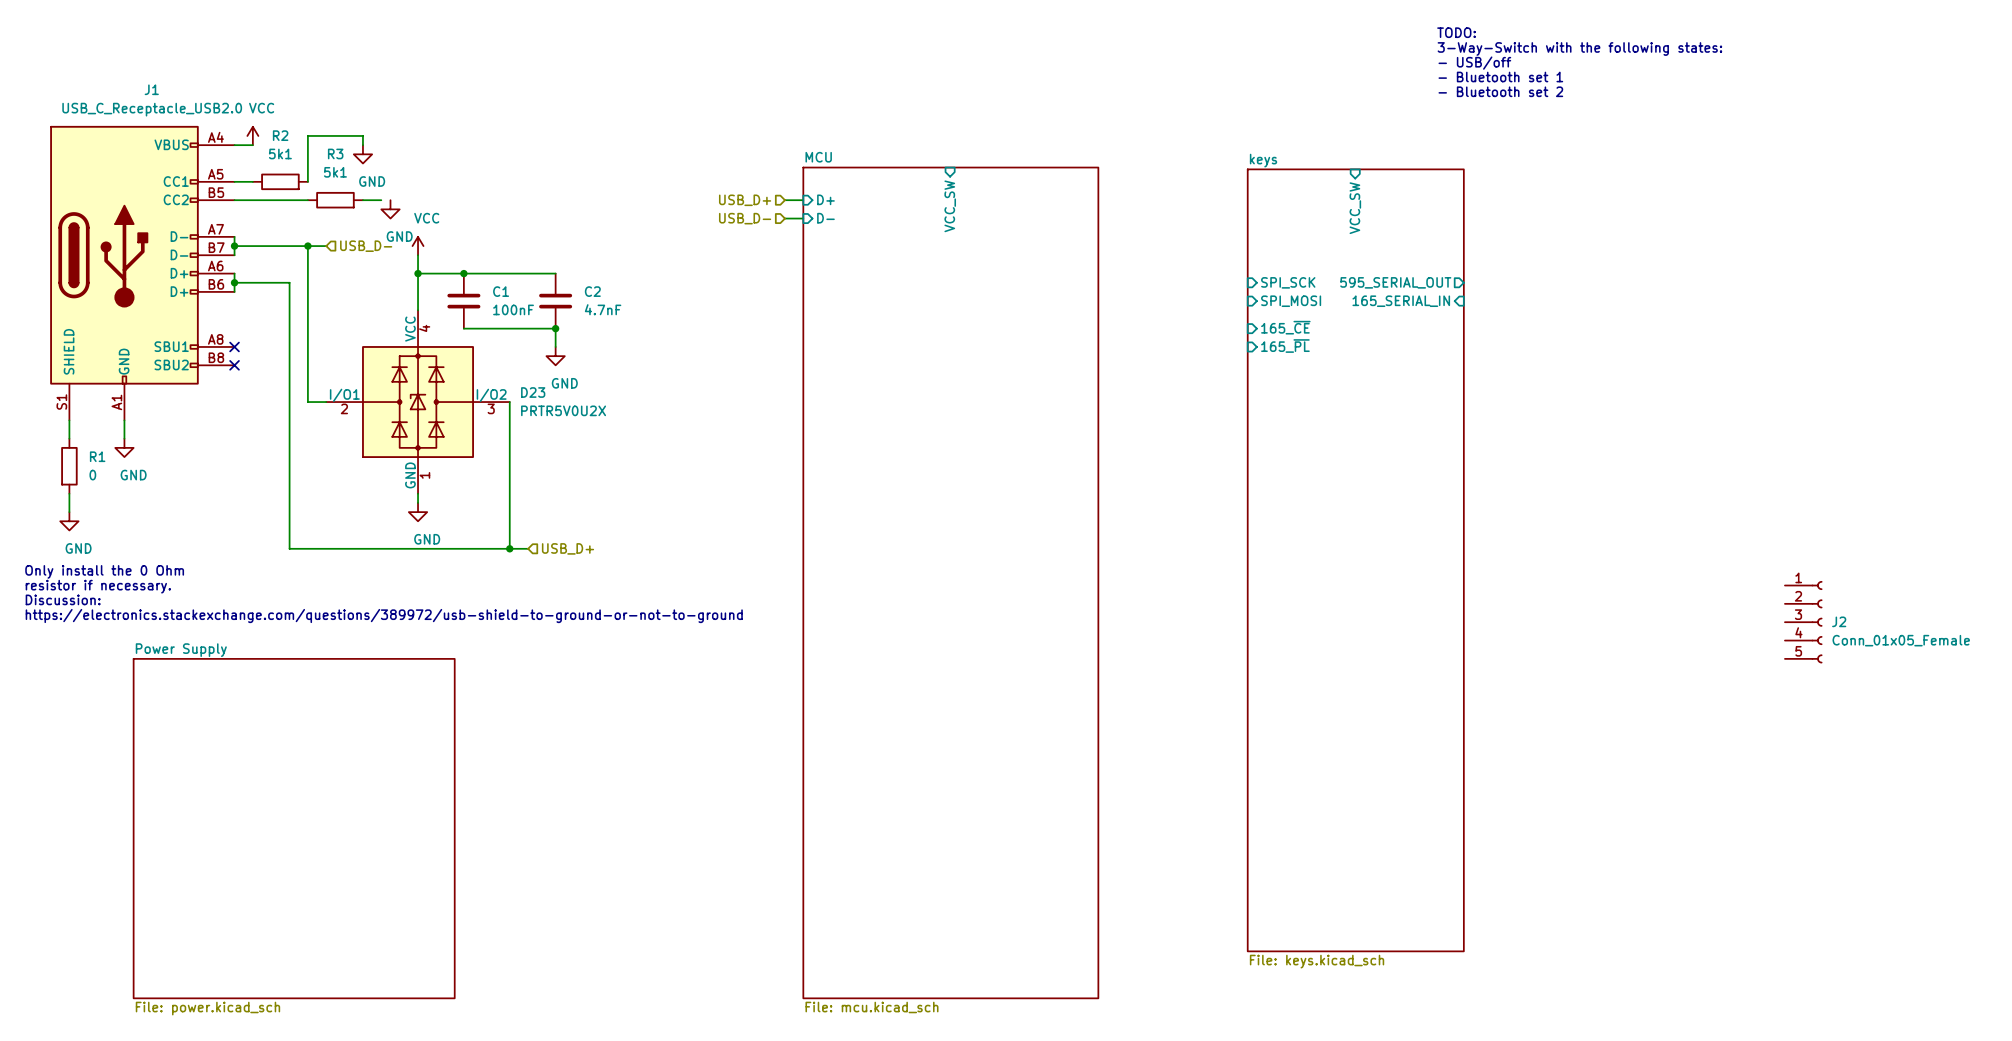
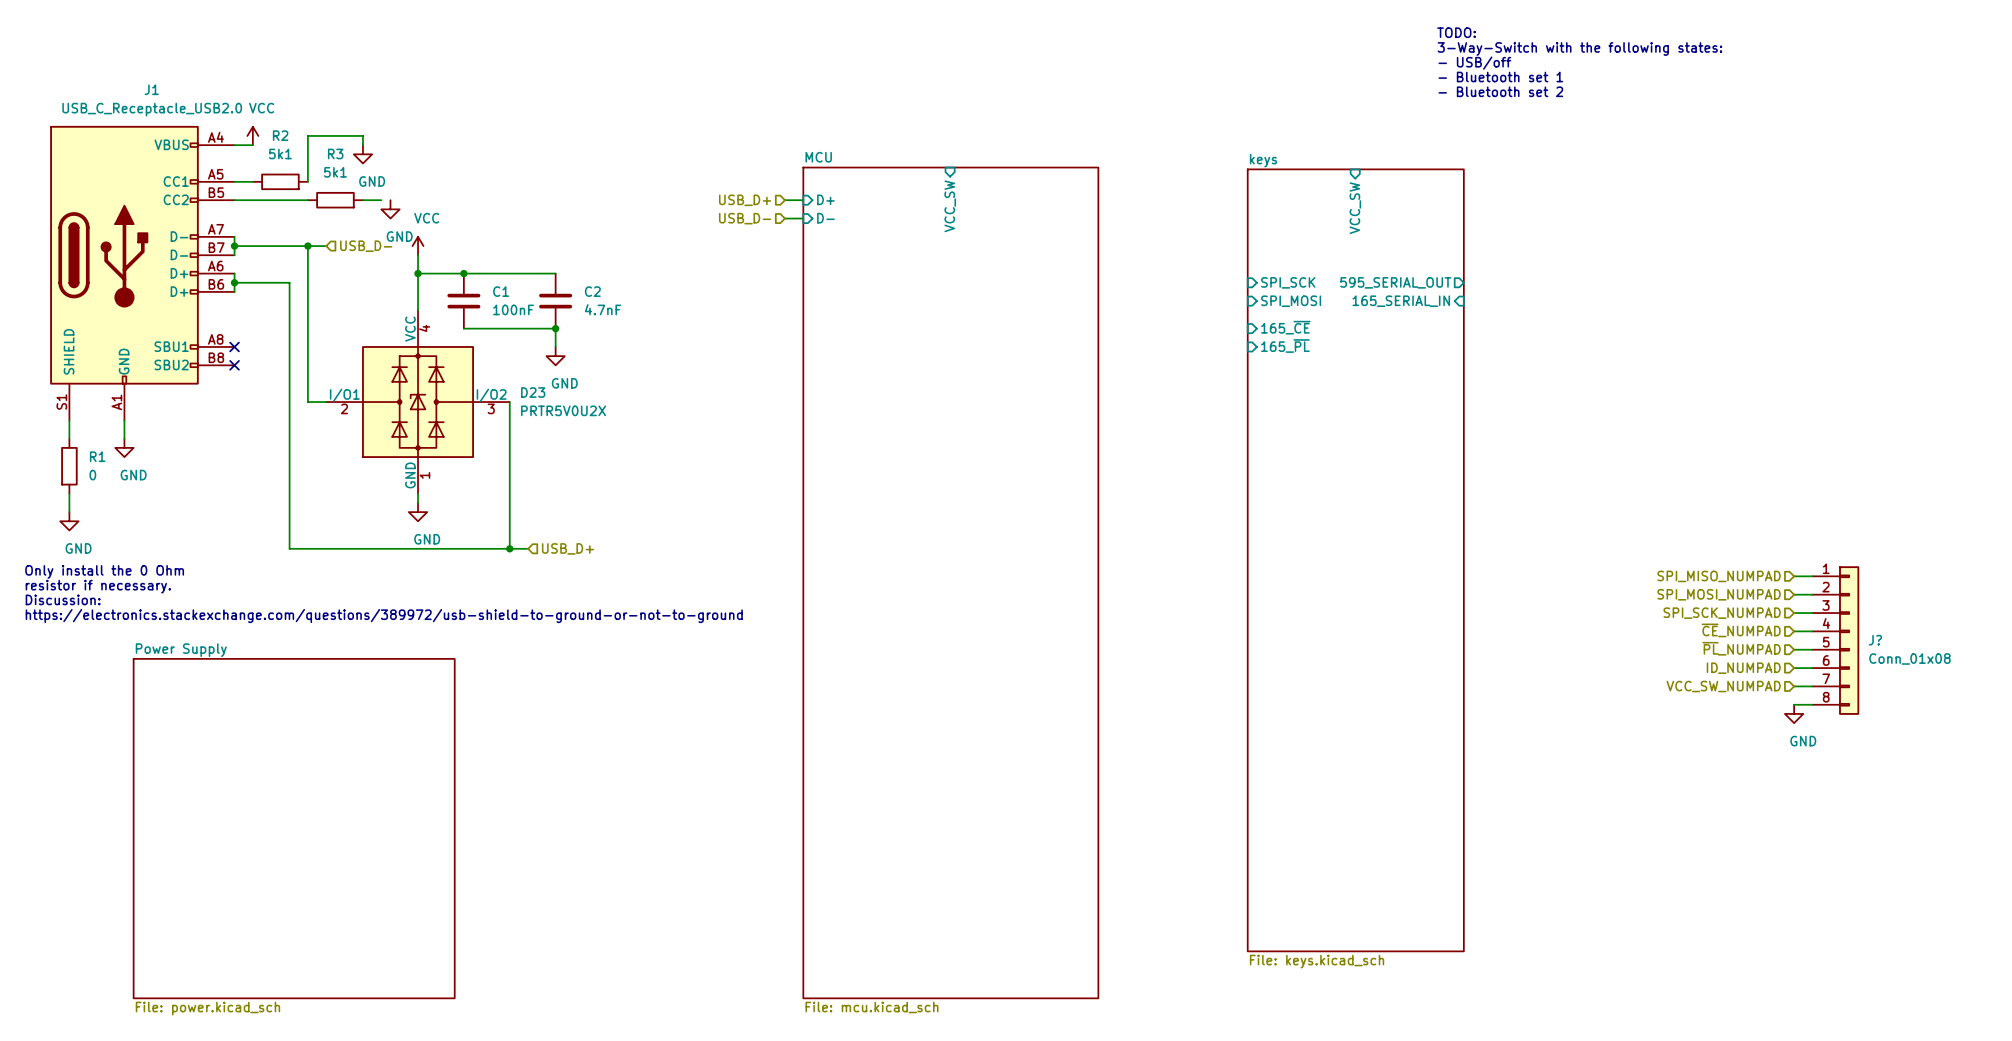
hierarchical label: none -> SPI_MISO_NUMPAD (1719, 576)
wire: none -> (1794, 576) (1812, 576)
hierarchical label: none -> SPI_MOSI_NUMPAD (1719, 594)
wire: none -> (1794, 594) (1812, 594)
hierarchical label: none -> SPI_SCK_NUMPAD (1722, 613)
wire: none -> (1794, 613) (1812, 613)
J2: Conn_01x05_Female (1803, 622) -> none
hierarchical label: none -> ~{CE}_NUMPAD (1741, 630)
wire: none -> (1794, 631) (1812, 631)
J?: none -> Conn_01x08 (1835, 640)
hierarchical label: none -> ~{PL}_NUMPAD (1741, 648)
wire: none -> (1794, 649) (1812, 649)
hierarchical label: none -> ID_NUMPAD (1743, 668)
wire: none -> (1794, 668) (1812, 668)
hierarchical label: none -> VCC_SW_NUMPAD (1723, 686)
wire: none -> (1794, 686) (1812, 686)
wire: none -> (1794, 704) (1812, 704)
power symbol: none -> GND (1794, 713)

